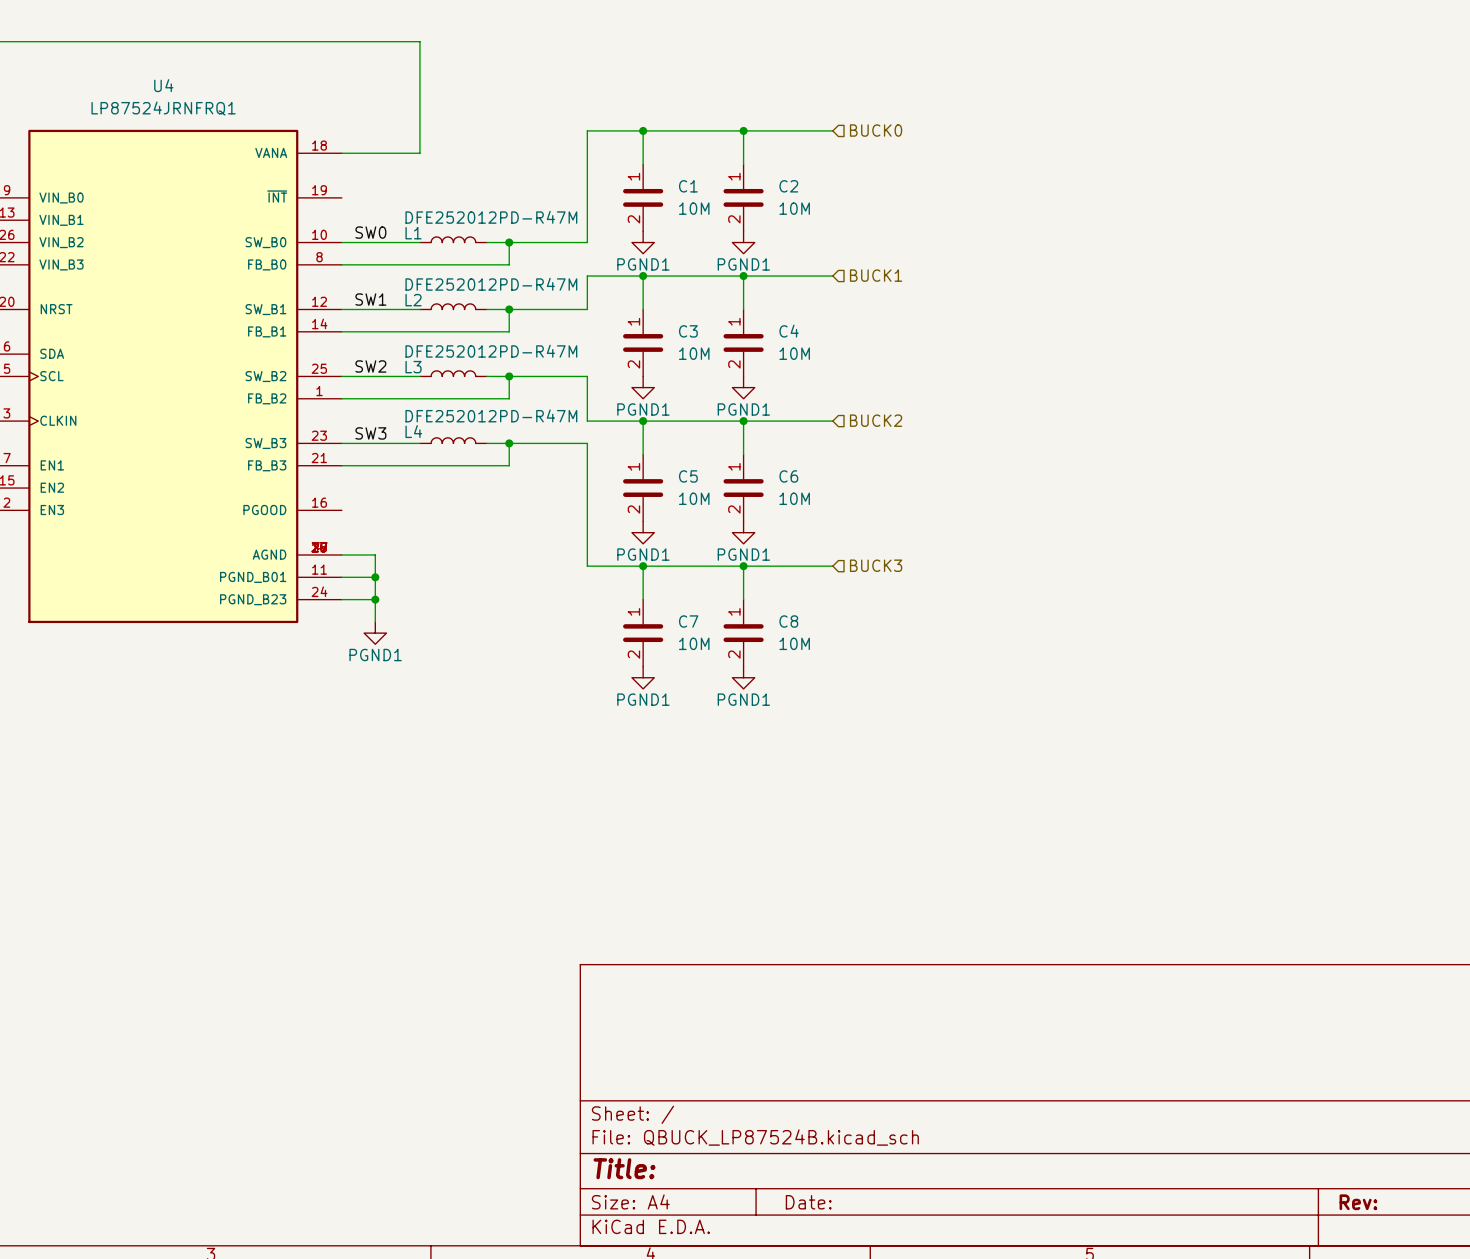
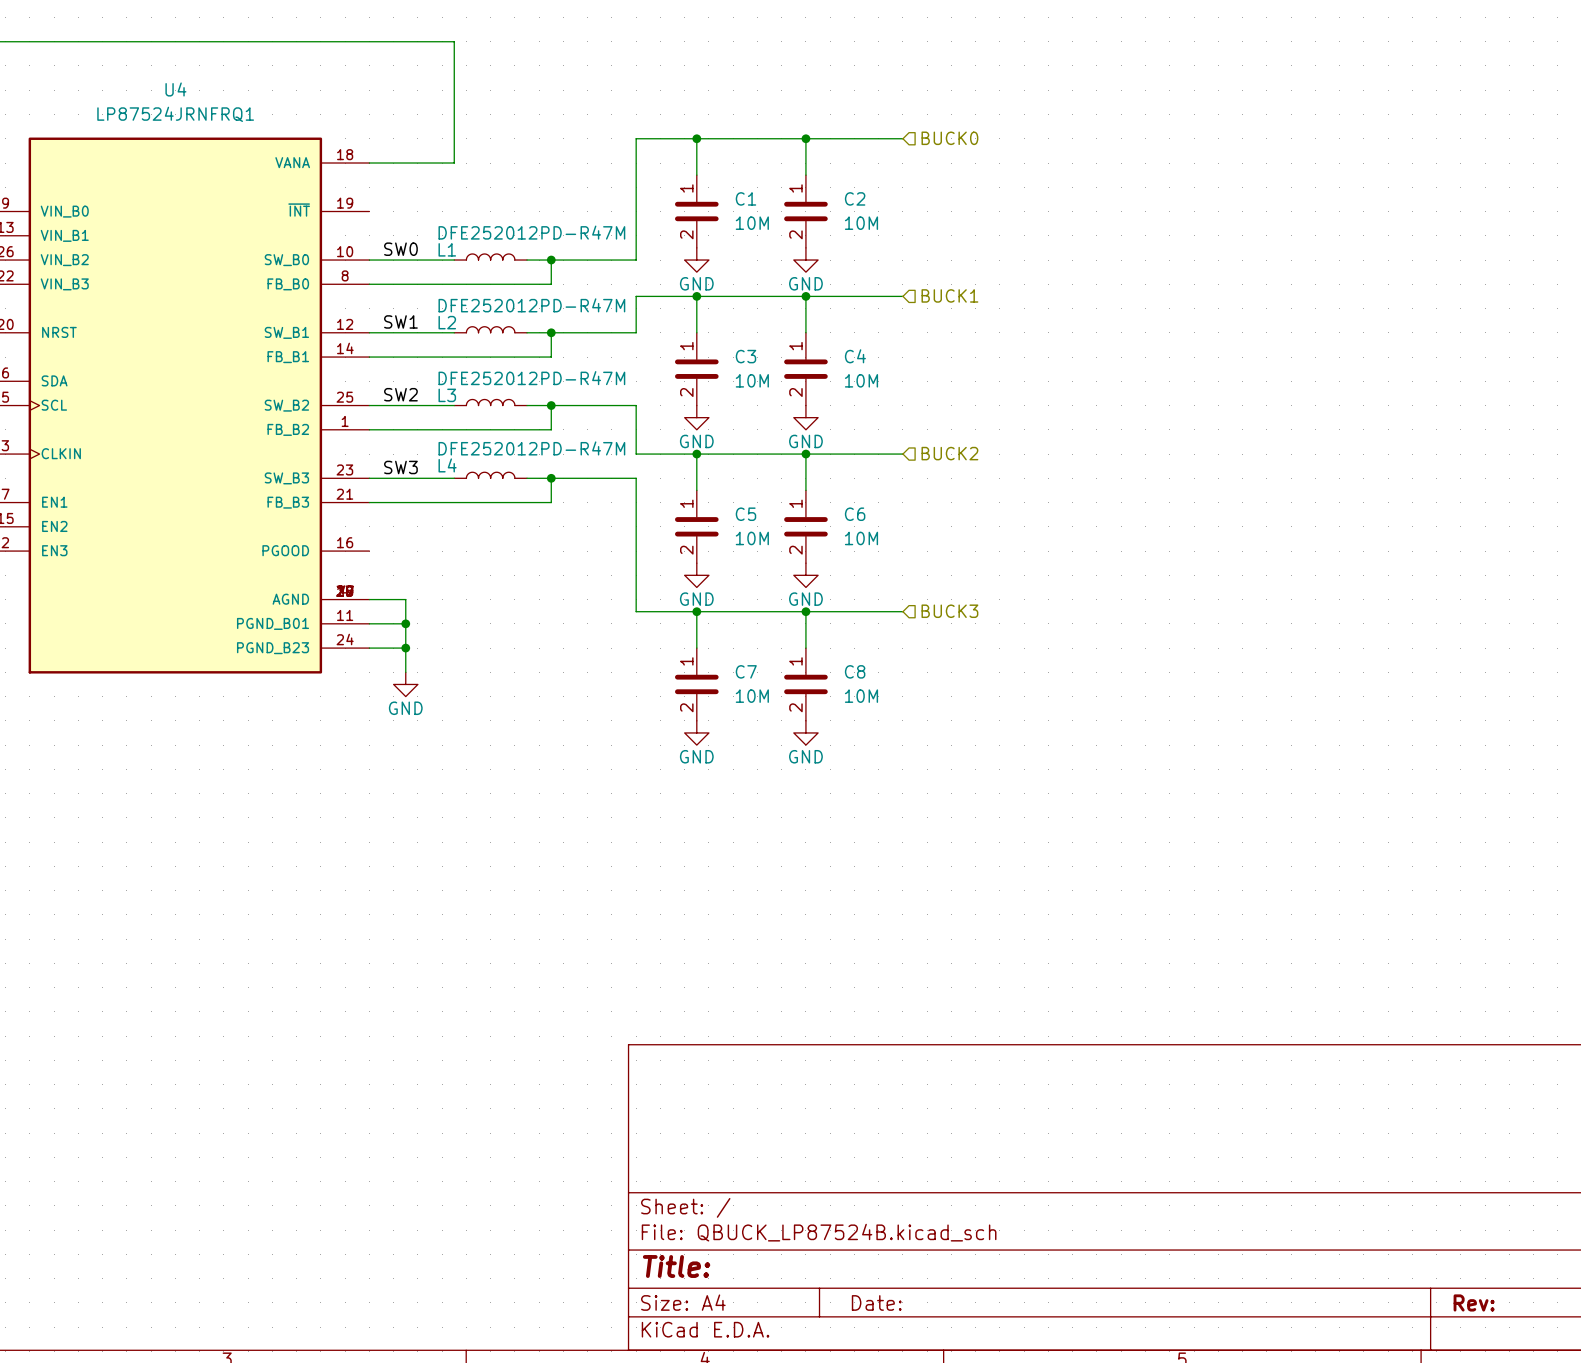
power symbol: PGND1 (643, 242) -> GND (696, 260)
power symbol: PGND1 (743, 242) -> GND (805, 260)
power symbol: PGND1 (643, 387) -> GND (696, 417)
power symbol: PGND1 (743, 387) -> GND (805, 417)
power symbol: PGND1 (643, 532) -> GND (696, 575)
power symbol: PGND1 (743, 532) -> GND (805, 575)
power symbol: PGND1 (375, 633) -> GND (405, 684)
power symbol: PGND1 (643, 677) -> GND (696, 732)
power symbol: PGND1 (743, 677) -> GND (805, 732)

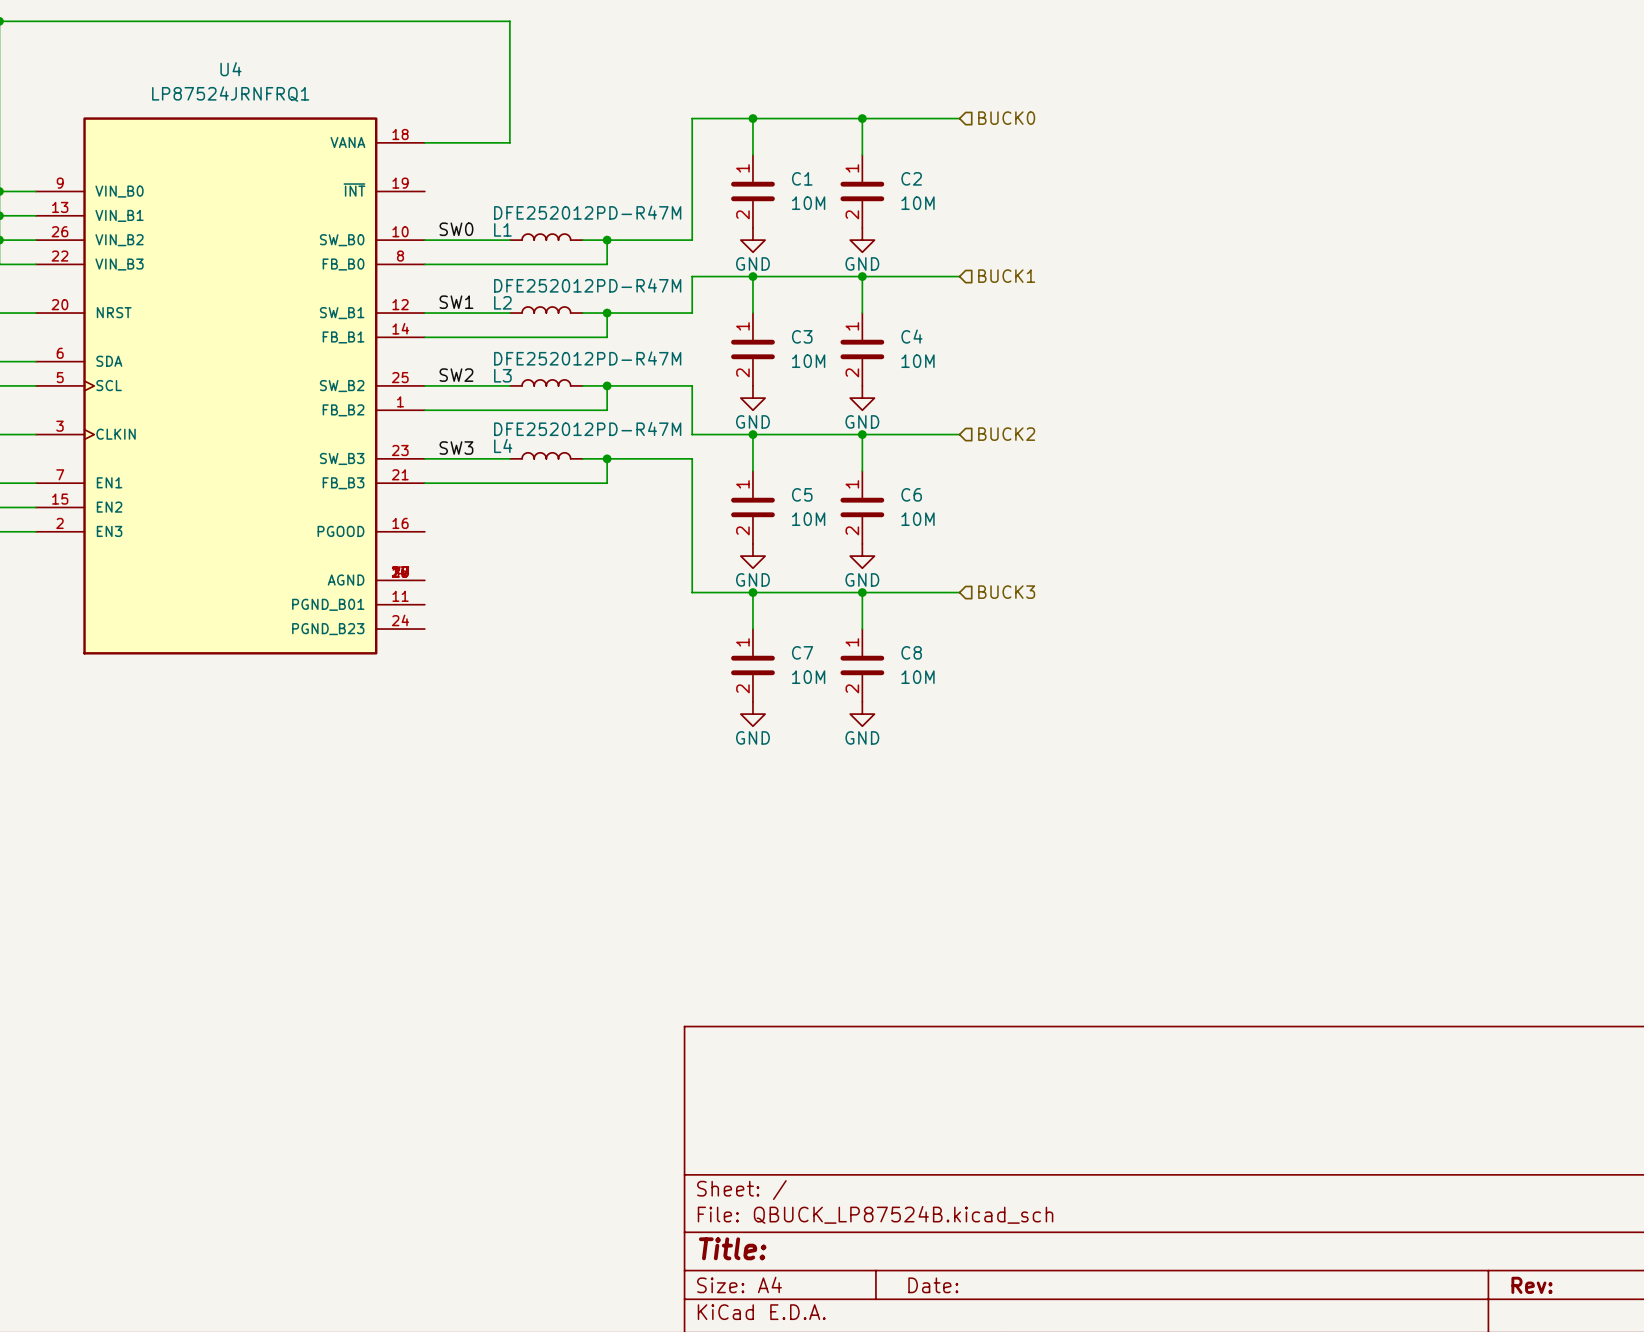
wire: (369, 599) (405, 599) (405, 672) -> none
wire: (369, 623) (405, 623) -> none
junction: (405, 623) -> none
wire: (369, 648) (405, 648) -> none
junction: (405, 648) -> none
power symbol: GND (405, 684) -> none

